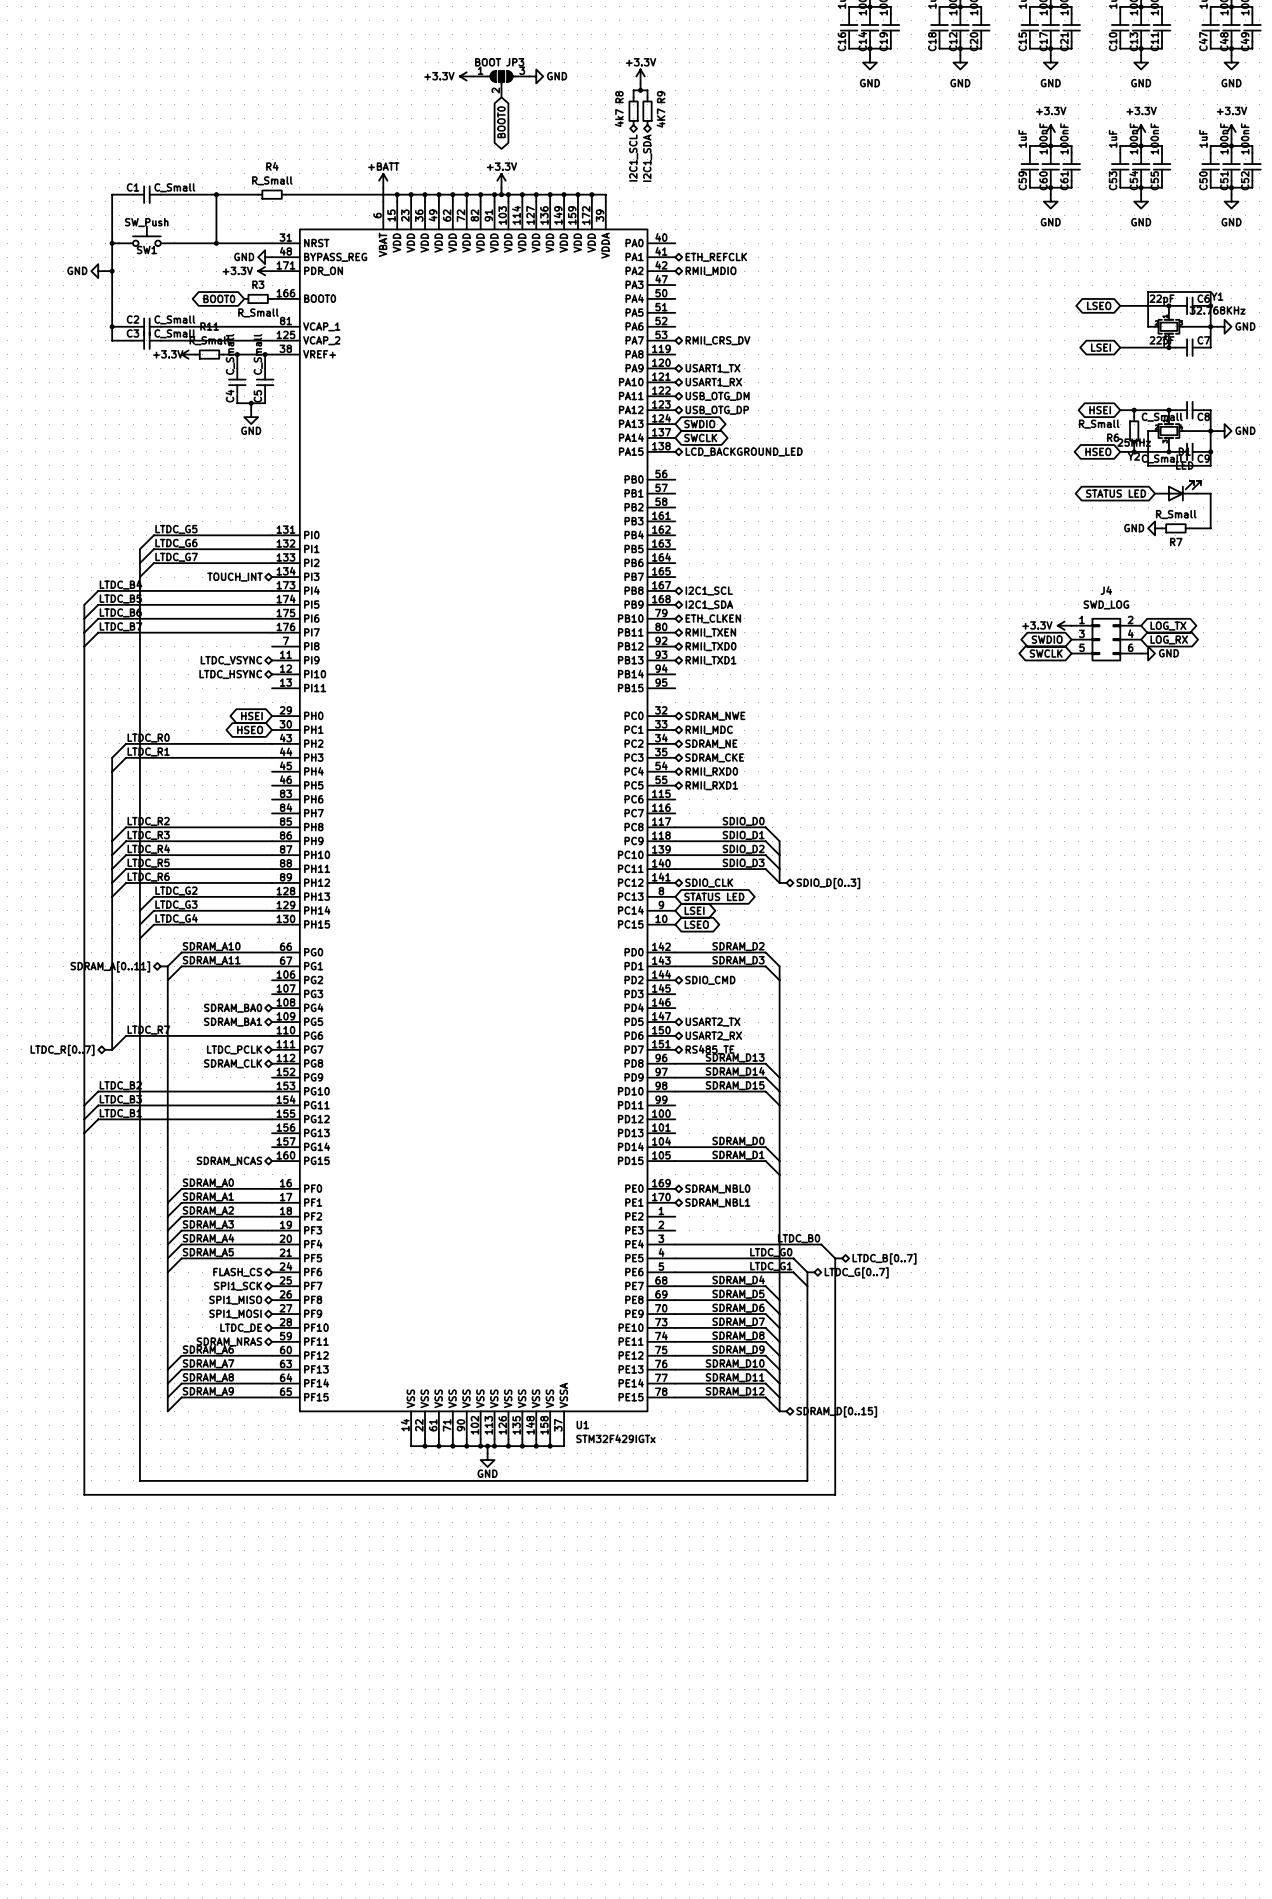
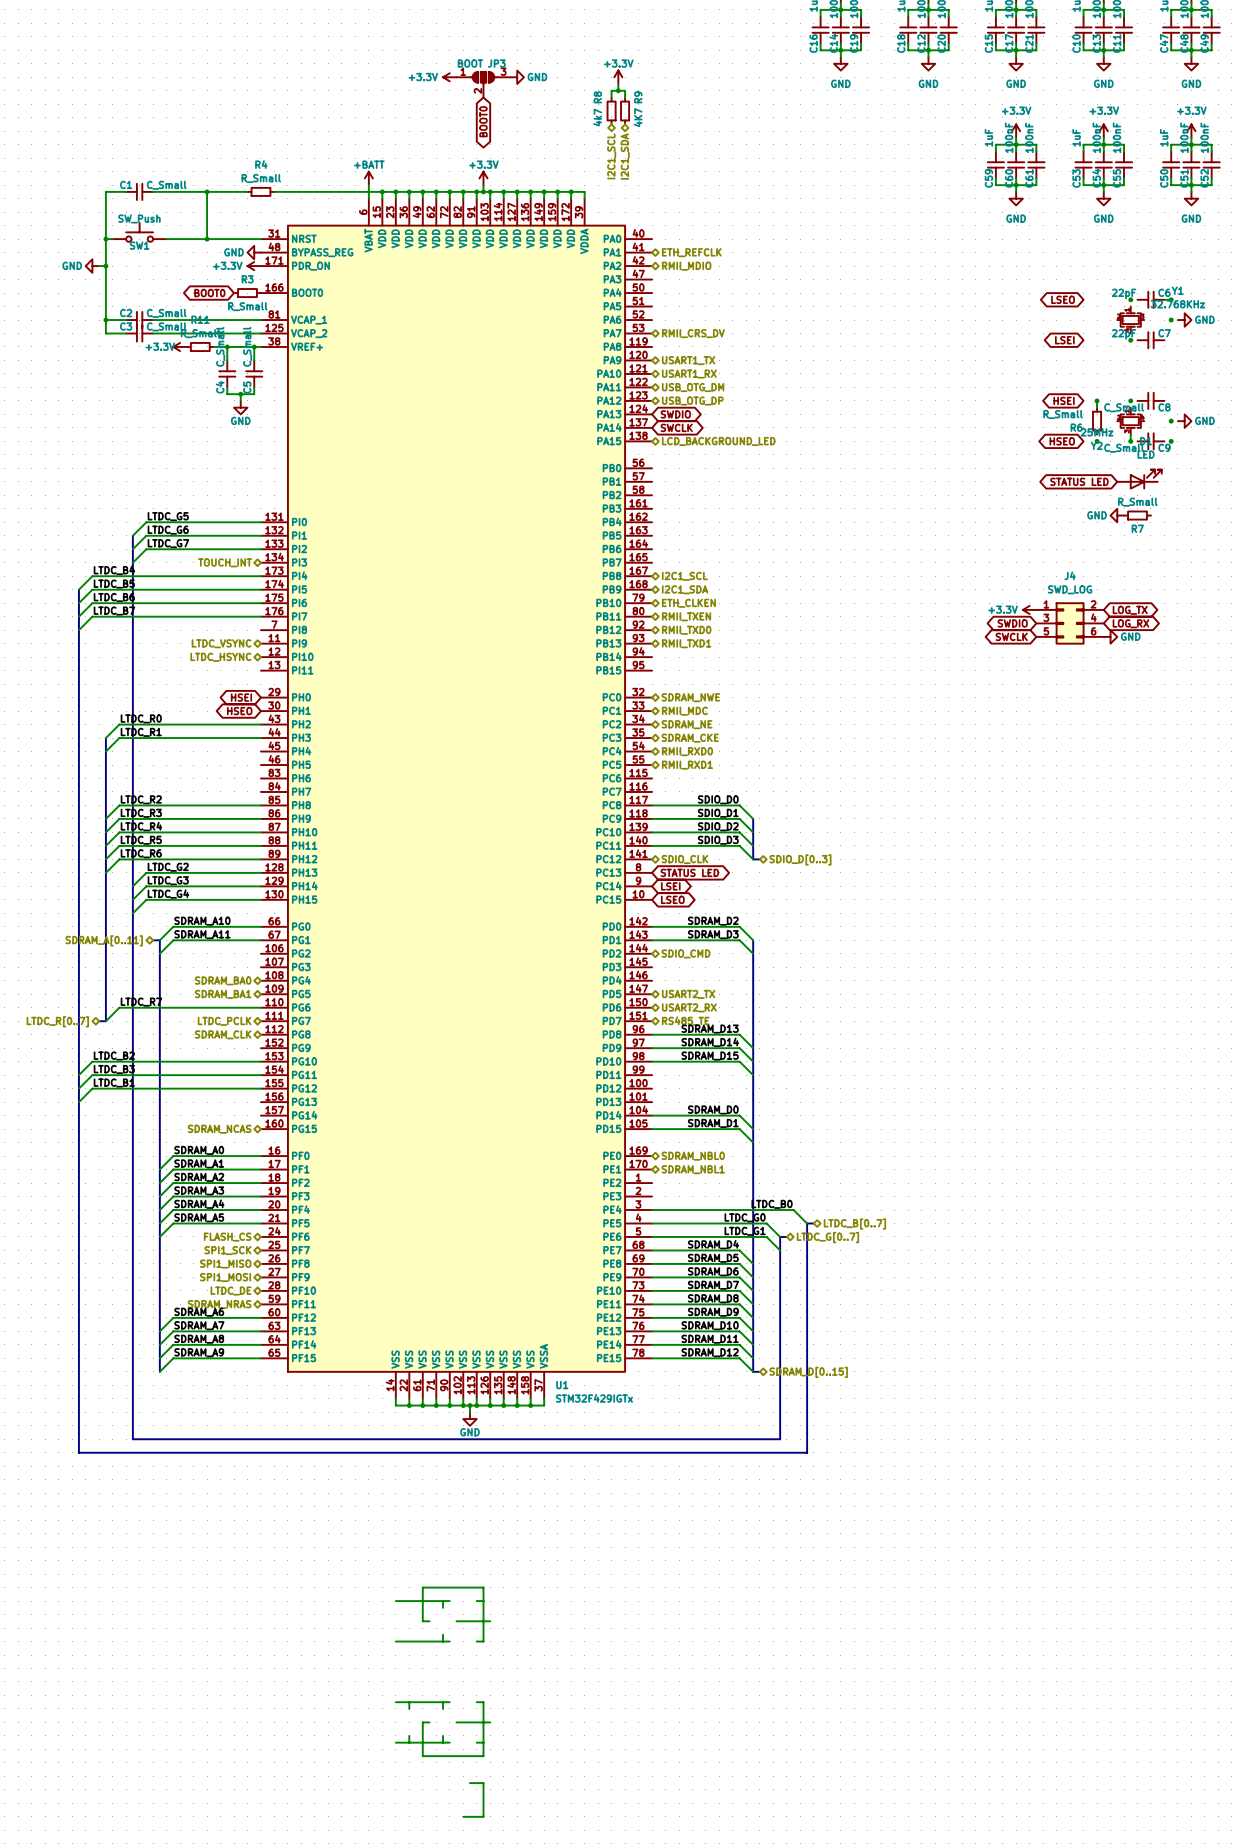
wire: (1120, 305) (1175, 305) -> none
wire: (1168, 305) (1168, 312) -> none
wire: (1155, 326) (1148, 326) (1148, 291) (1210, 291) (1210, 347) (1203, 347) -> none
wire: (1182, 326) (1217, 326) -> none
wire: (1168, 340) (1168, 347) -> none
wire: (1120, 347) (1175, 347) -> none
wire: (1120, 410) (1175, 410) -> none
wire: (1168, 410) (1168, 417) -> none
wire: (1203, 410) (1210, 410) (1210, 465) (1148, 465) (1148, 431) (1155, 431) -> none
wire: (1182, 431) (1217, 431) -> none
wire: (1134, 444) (1134, 451) -> none
wire: (1120, 451) (1175, 451) -> none
wire: (1203, 451) (1210, 451) -> none
wire: (1196, 493) (1210, 493) (1210, 528) (1189, 528) -> none
wire: none -> (395, 1601) (449, 1601)
wire: none -> (443, 1601) (443, 1607)
wire: none -> (476, 1601) (483, 1601)
wire: none -> (429, 1621) (422, 1621) (422, 1587) (483, 1587) (483, 1641) (476, 1641)
wire: none -> (456, 1621) (490, 1621)
wire: none -> (443, 1634) (443, 1641)
wire: none -> (395, 1641) (449, 1641)
wire: none -> (395, 1702) (449, 1702)
wire: none -> (409, 1702) (409, 1708)
wire: none -> (443, 1702) (443, 1708)
wire: none -> (476, 1702) (483, 1702) (483, 1756) (422, 1756) (422, 1722) (429, 1722)
wire: none -> (456, 1722) (490, 1722)
wire: none -> (409, 1735) (409, 1742)
wire: none -> (443, 1735) (443, 1742)
wire: none -> (395, 1742) (449, 1742)
wire: none -> (476, 1742) (483, 1742)
wire: none -> (470, 1783) (483, 1783) (483, 1816) (463, 1816)

